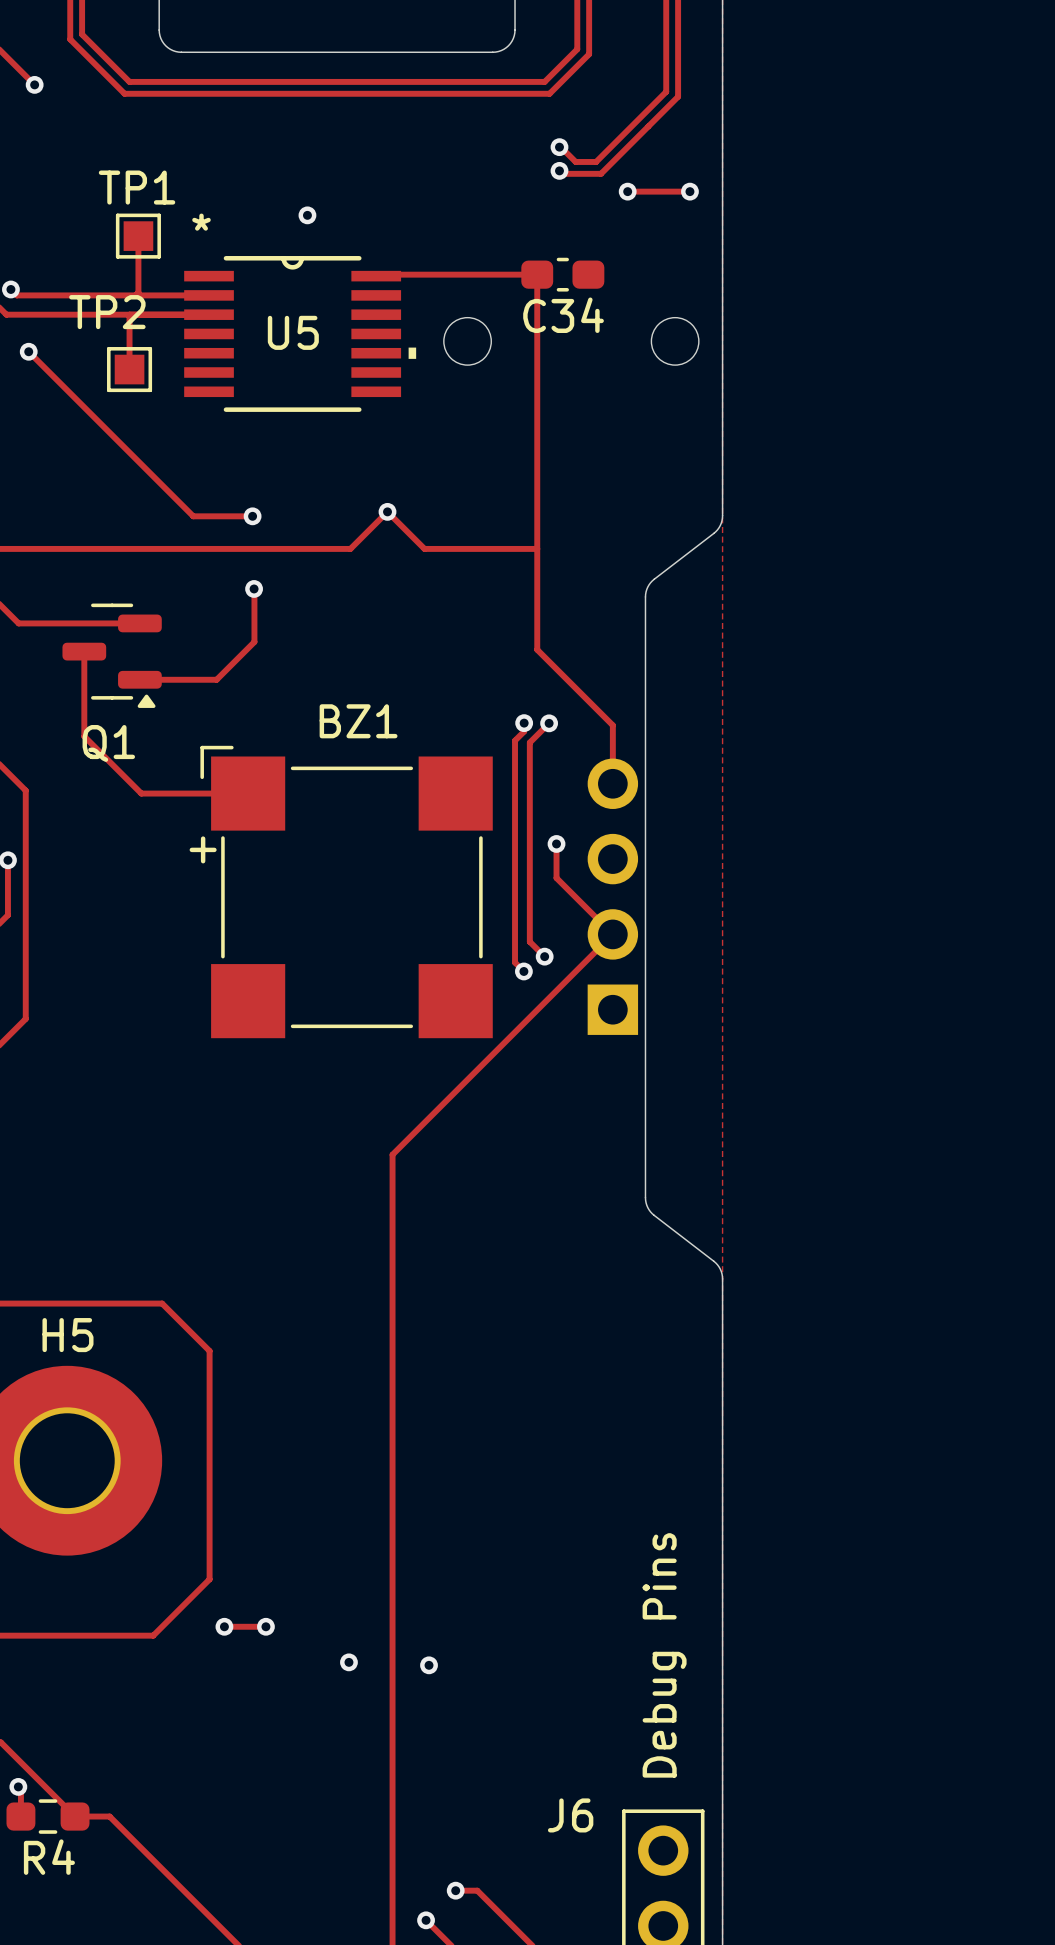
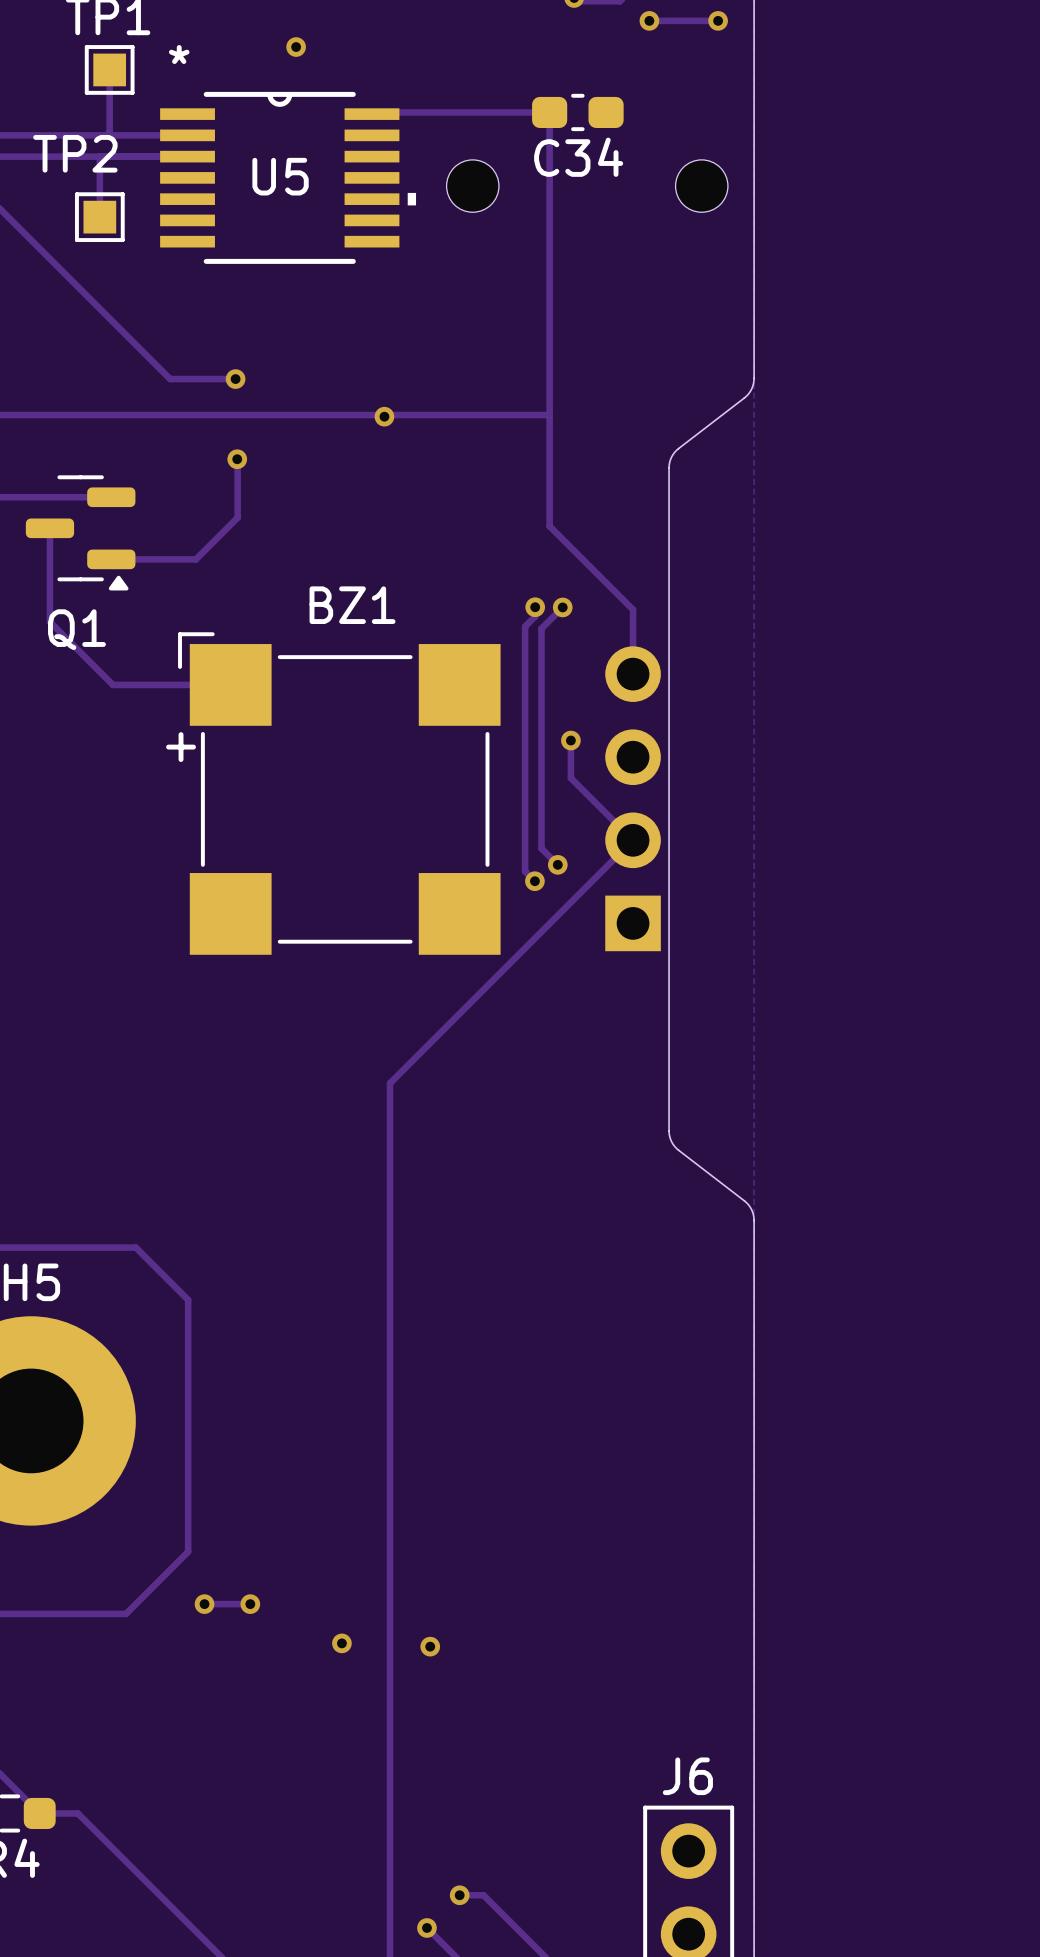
via position: (387, 511) -> (384, 416)
track: (350, 548) (387, 511) (424, 548) -> (343, 415) (382, 415) (384, 416) (386, 415) (425, 415)
text: Debug Pins (664, 1655) -> none
J6 name position: J6 (570, 1815) -> J6 (687, 1776)

